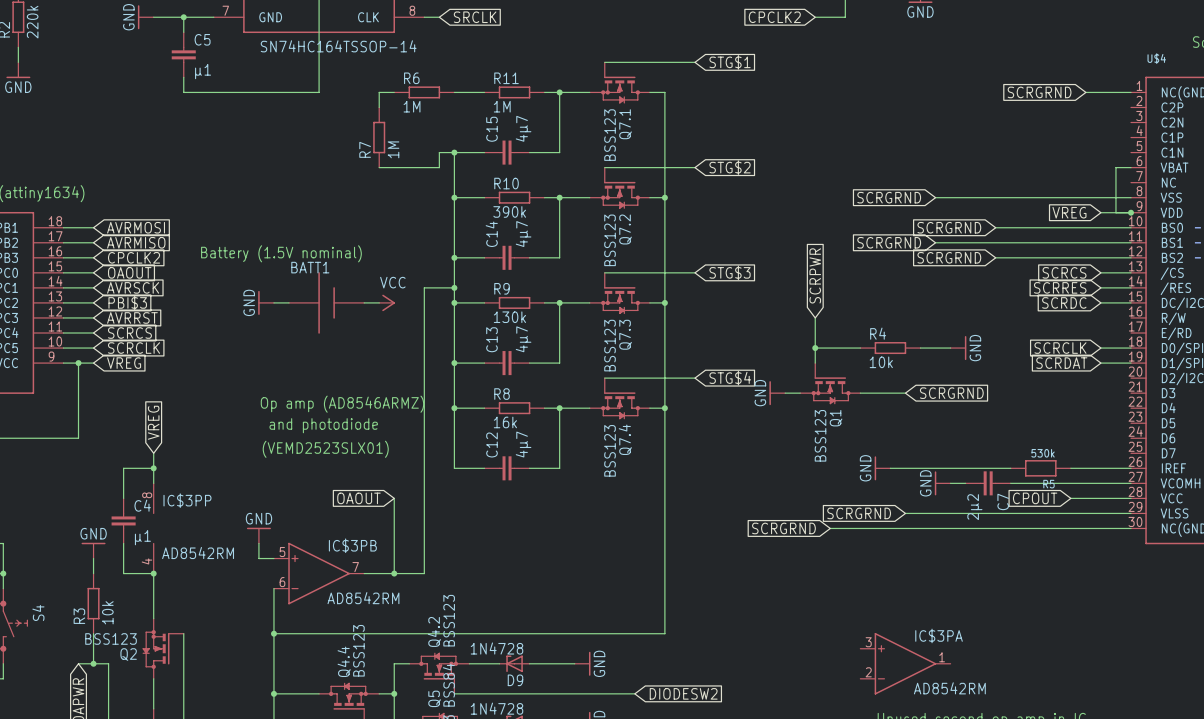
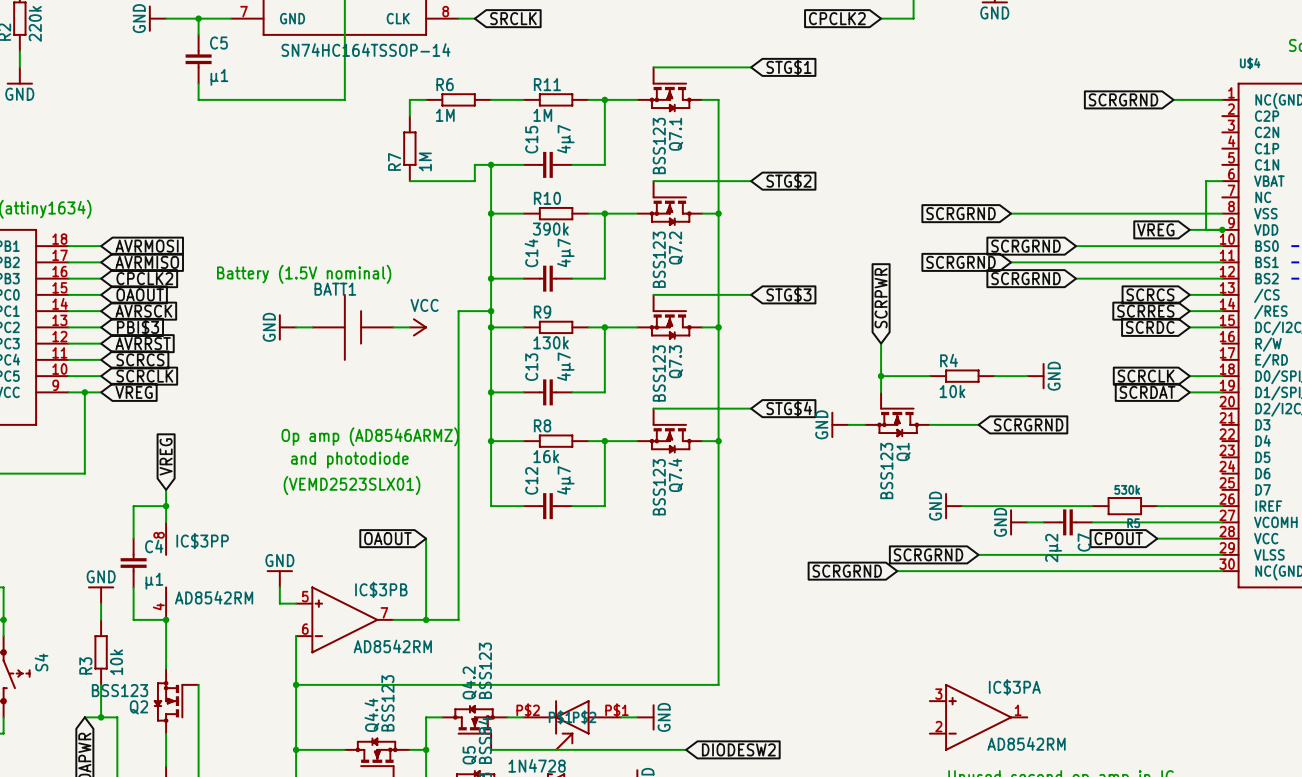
D9: 1N4728 (514, 663) -> none
power symbol position: GND (582, 663) -> GND (645, 717)
part: none -> (572, 725)

